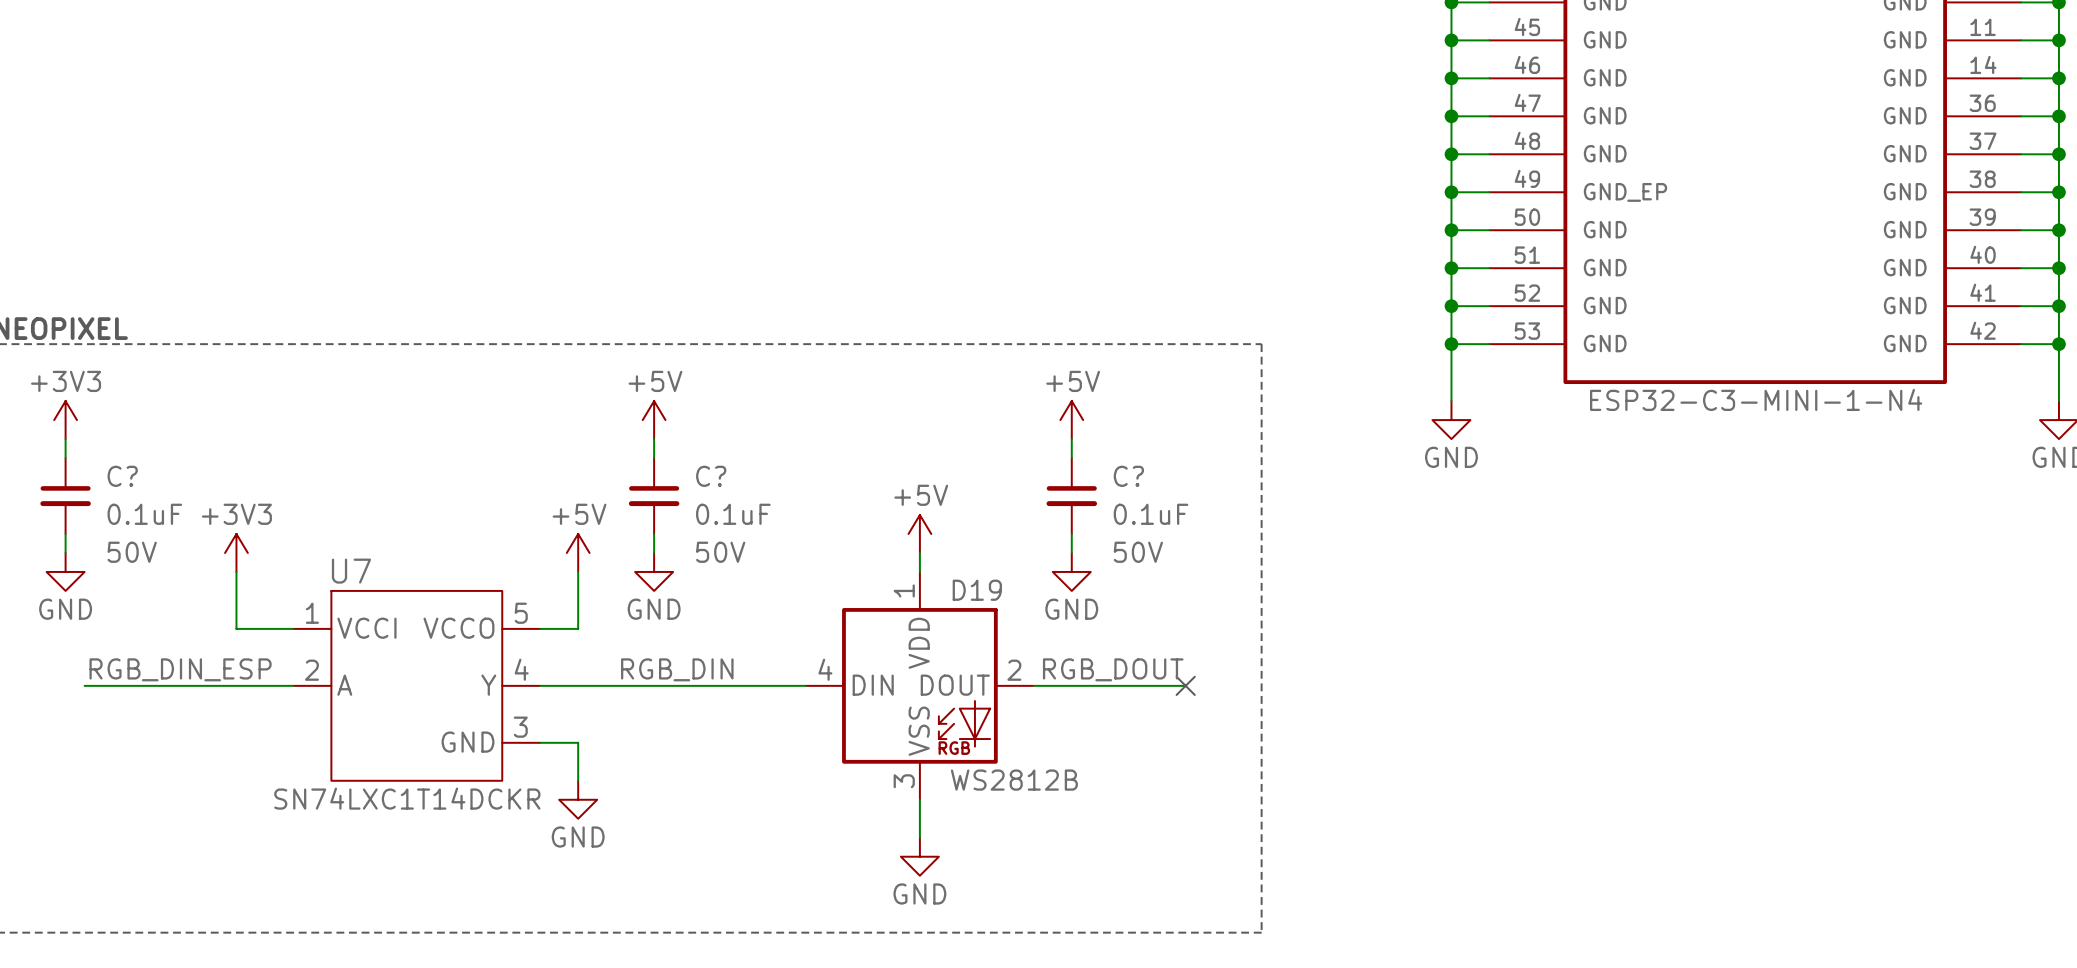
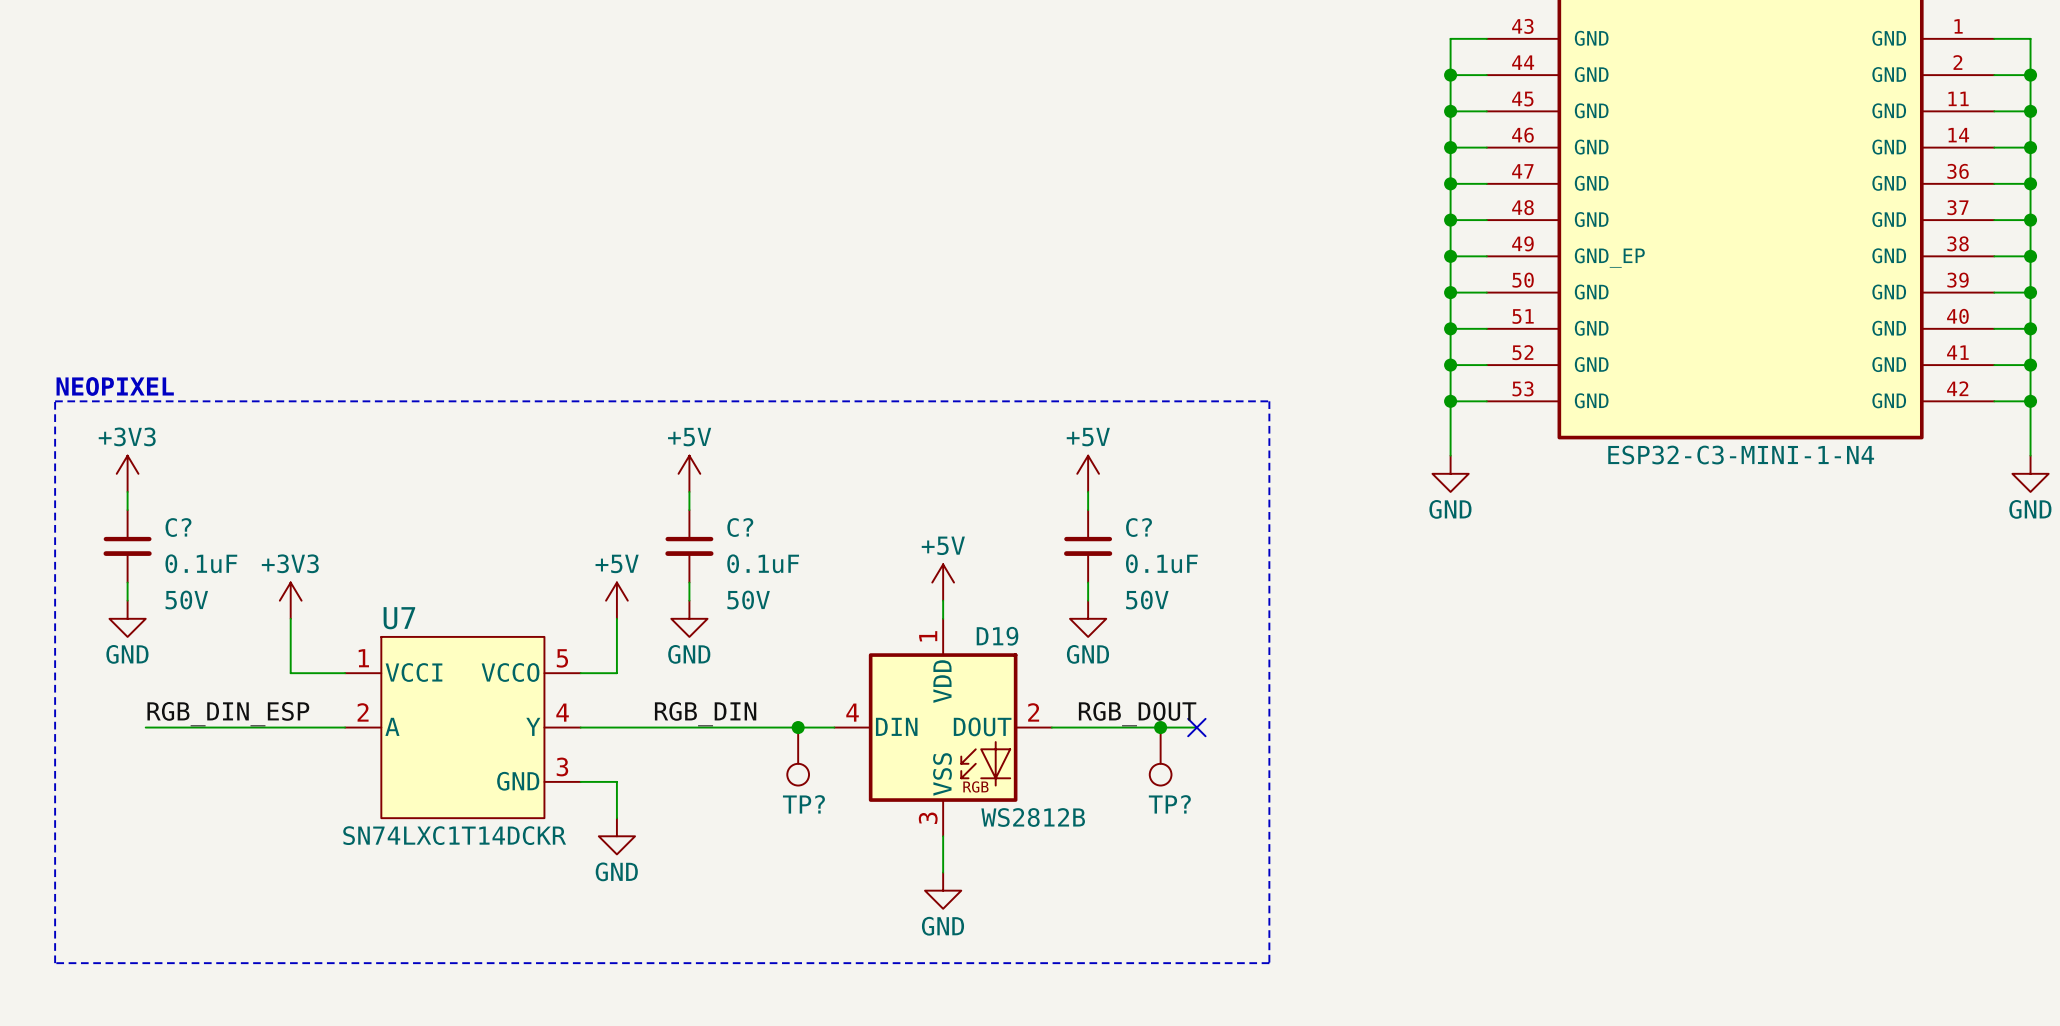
junction: none -> (798, 727)
junction: none -> (1160, 727)
TP?: none -> (798, 756)
TP?: none -> (1160, 756)

